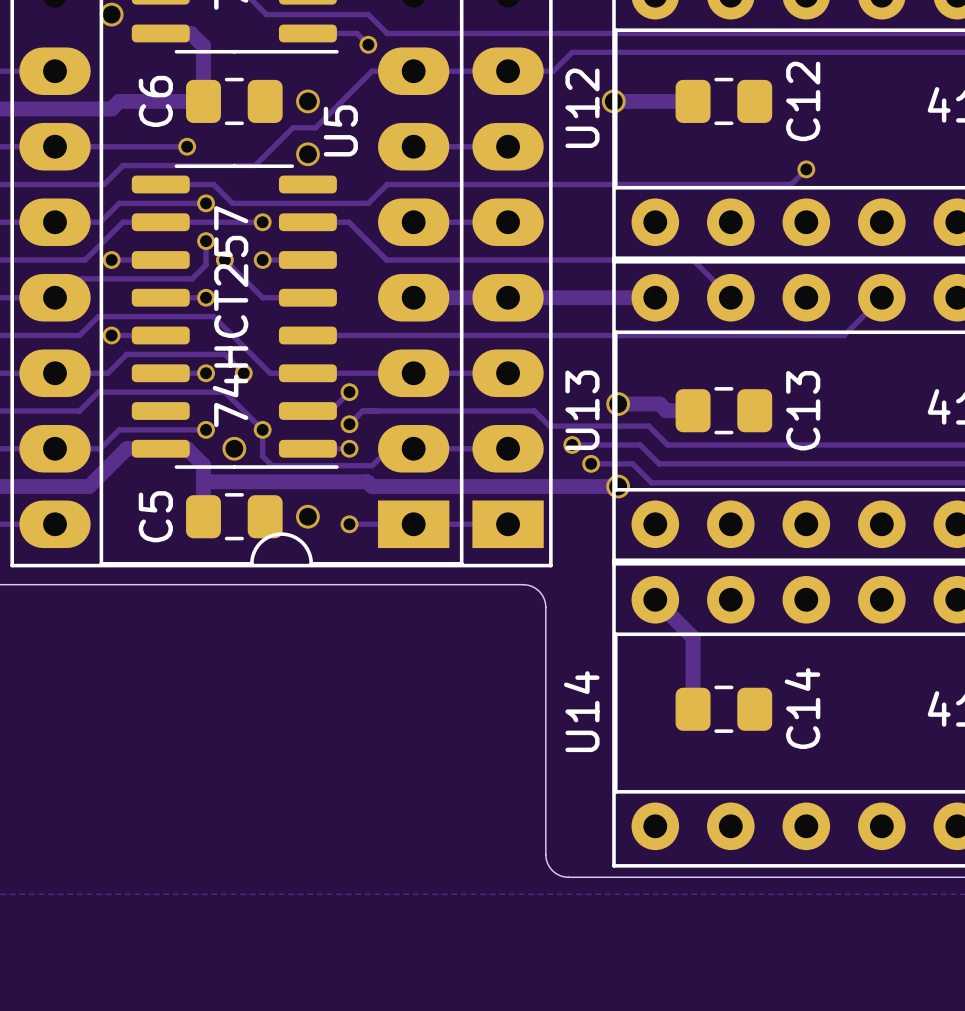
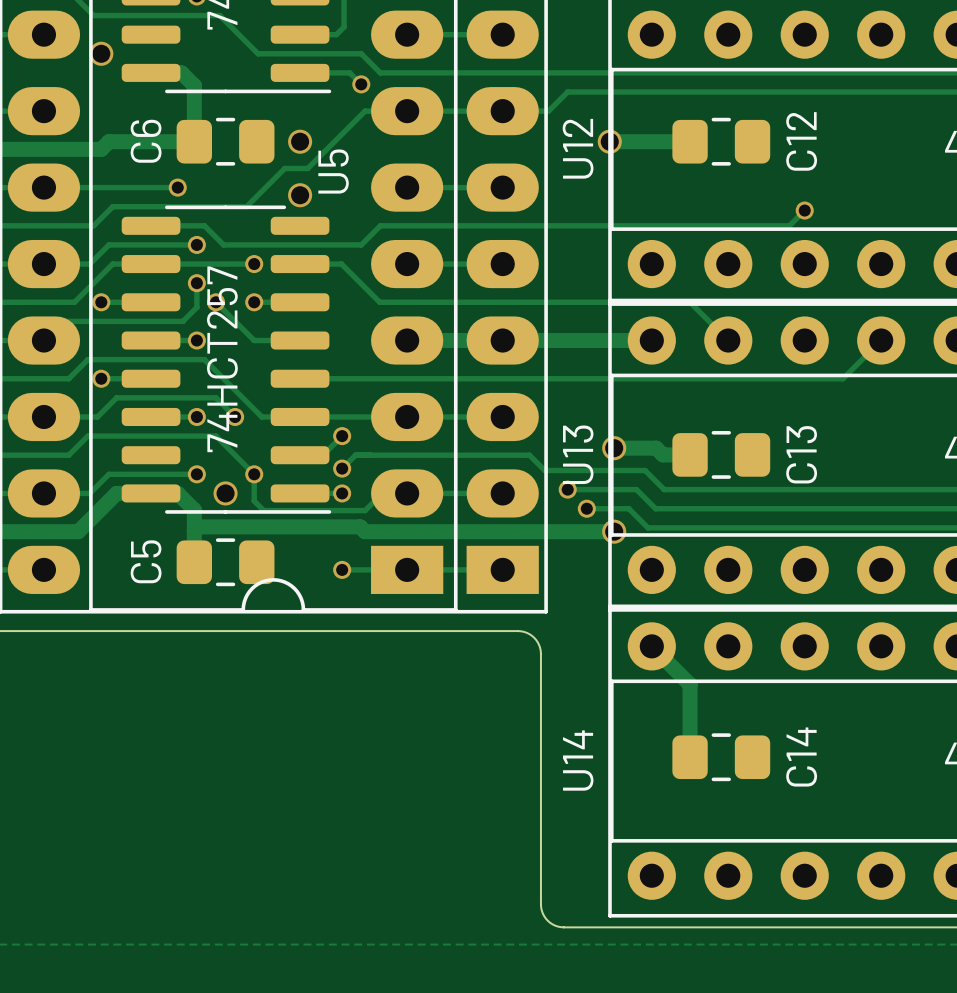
via: (307, 516) -> none

